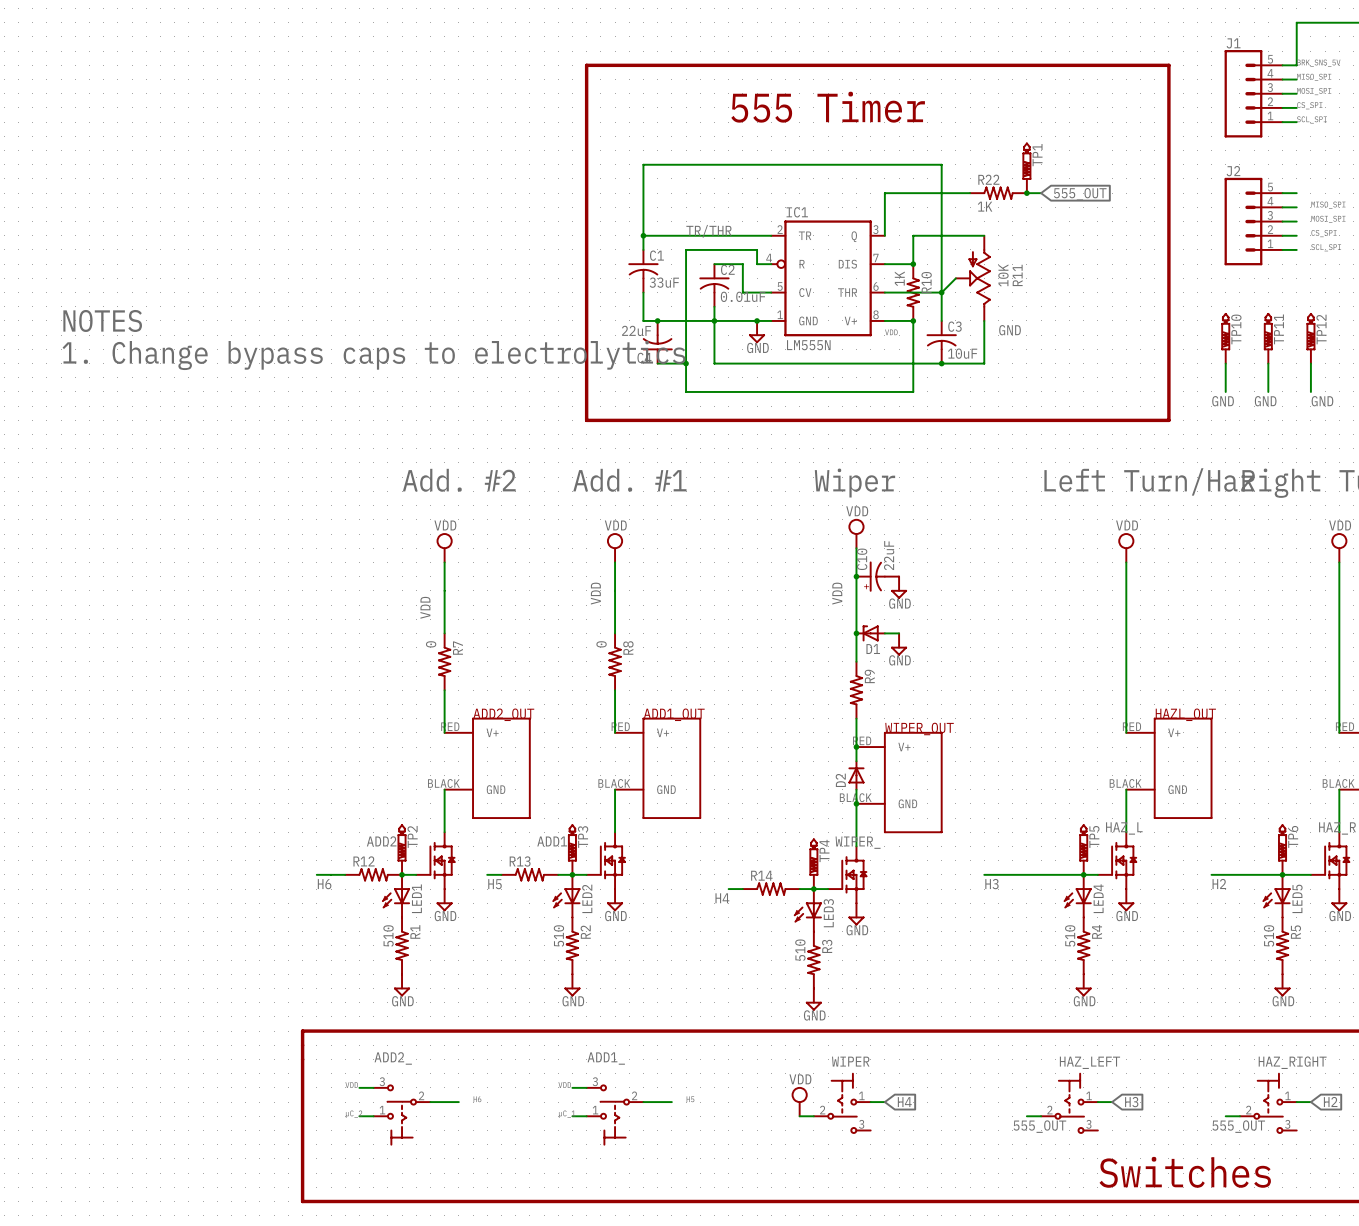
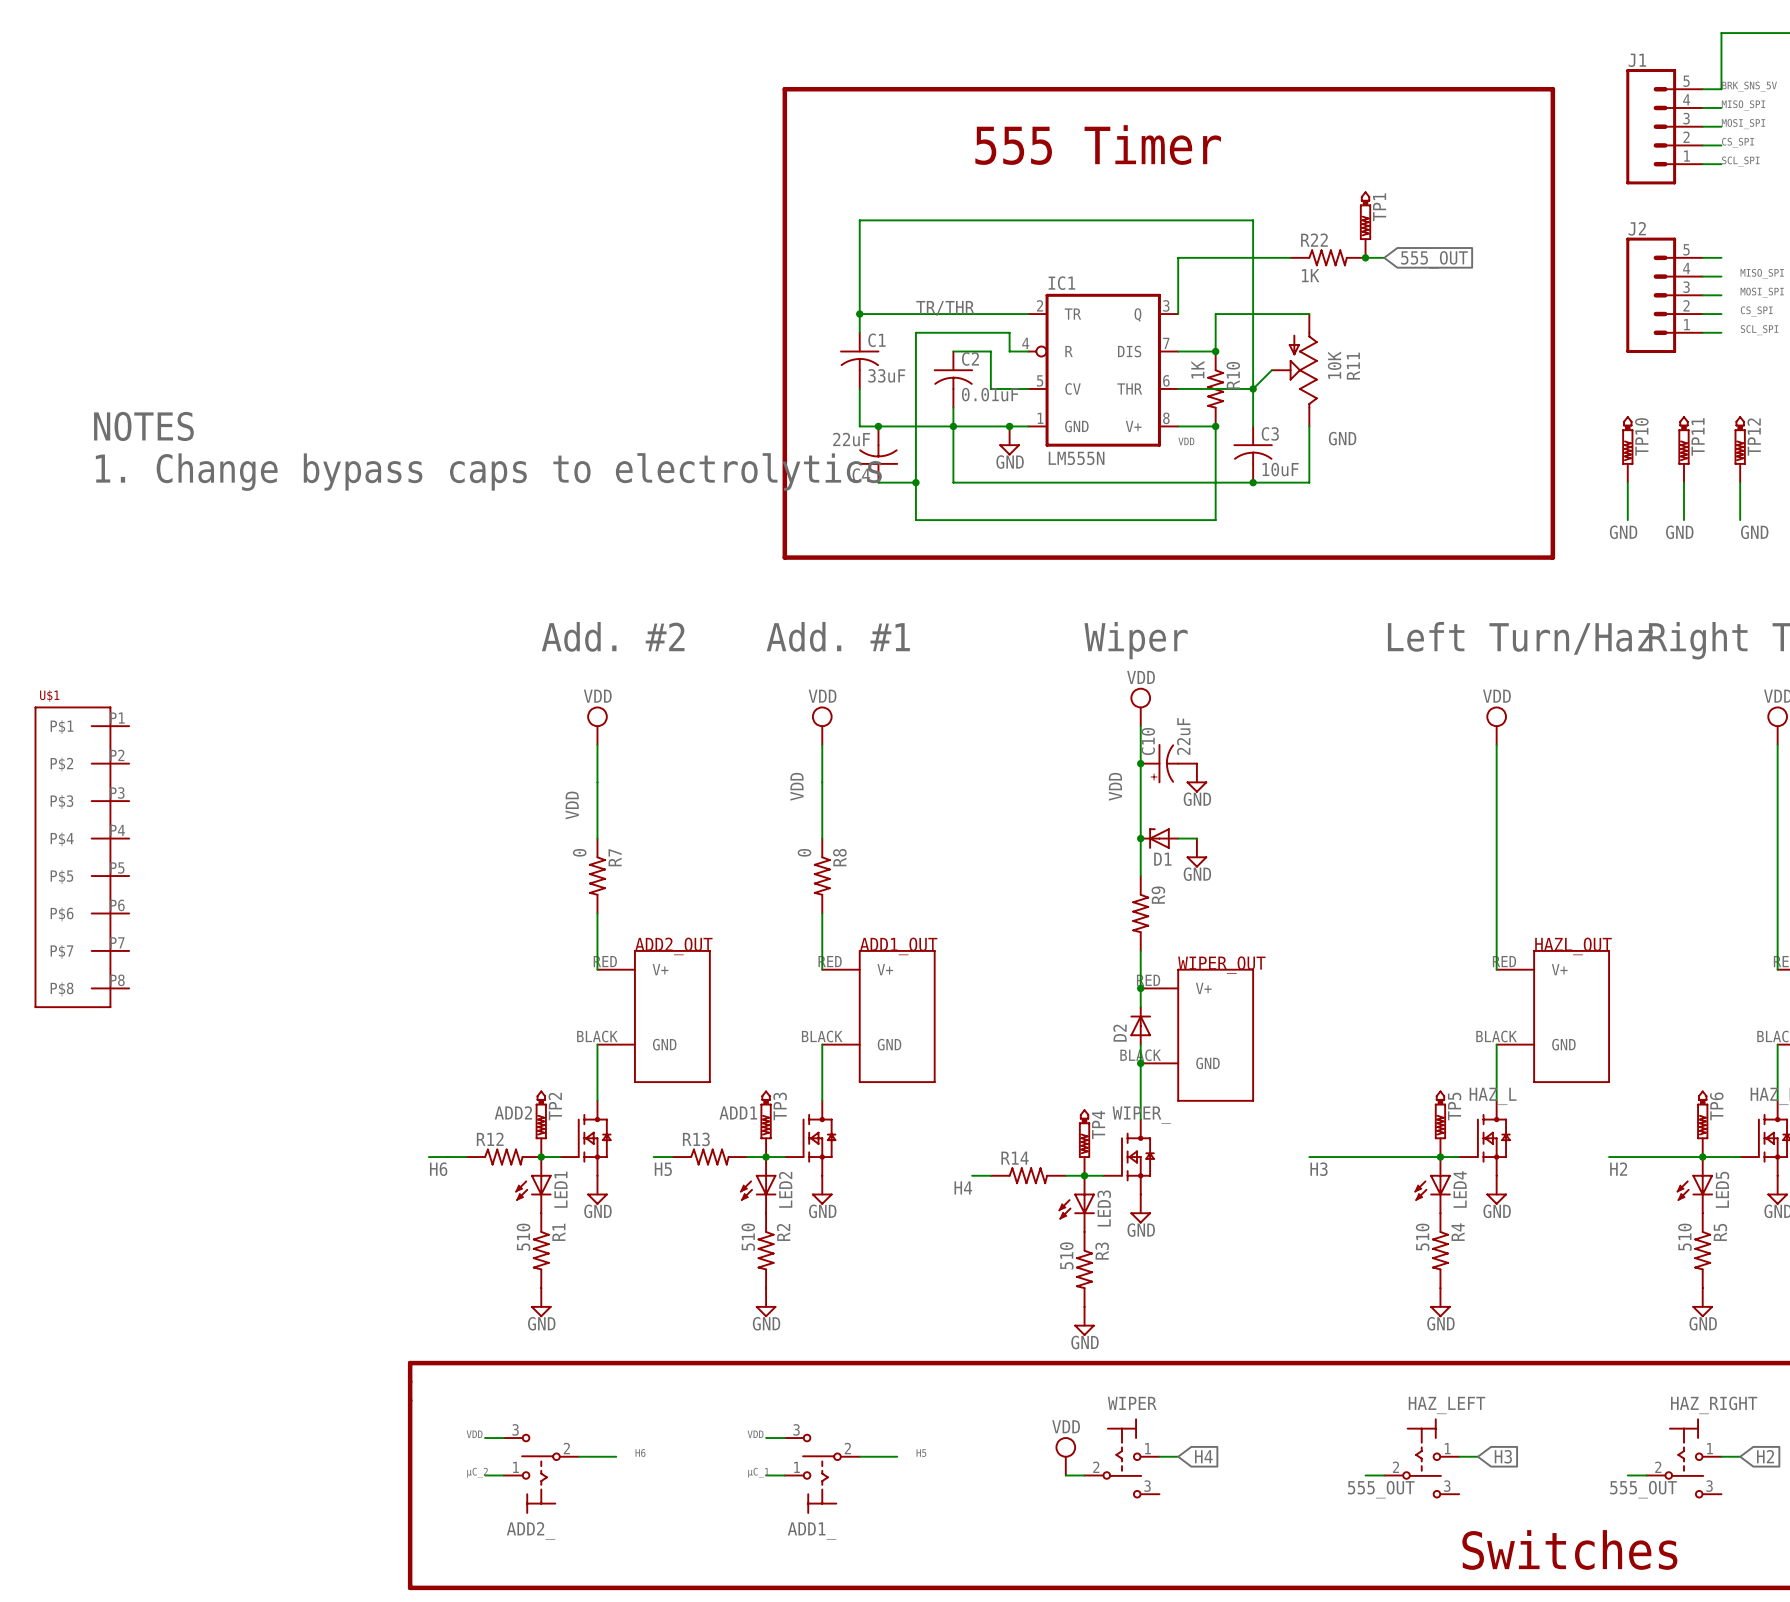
U$1: none -> (81, 857)
ADD2_ name position: ADD2_ (393, 1058) -> ADD2_ (531, 1530)
ADD1_ name position: ADD1_ (606, 1058) -> ADD1_ (812, 1530)

